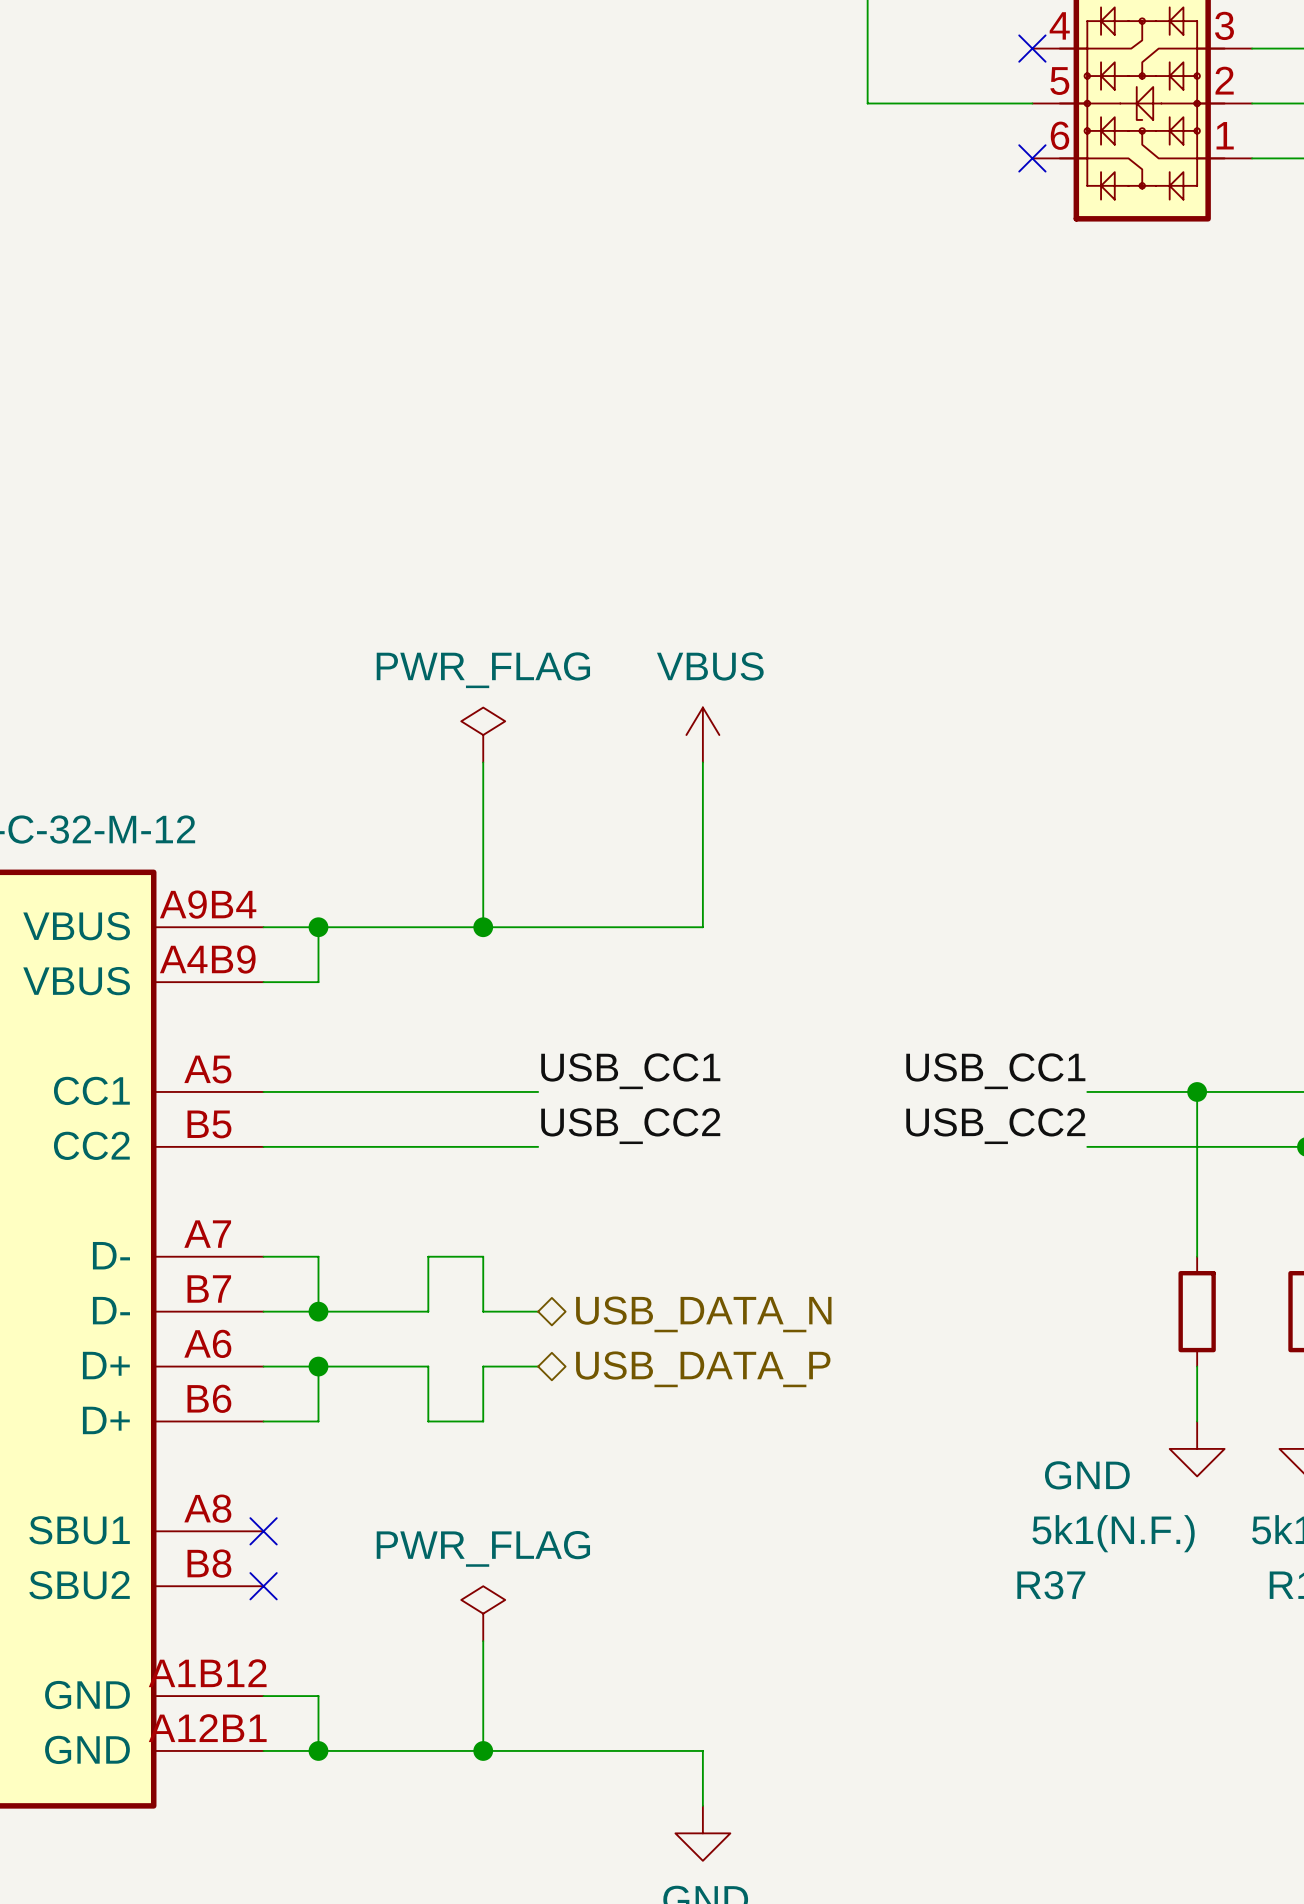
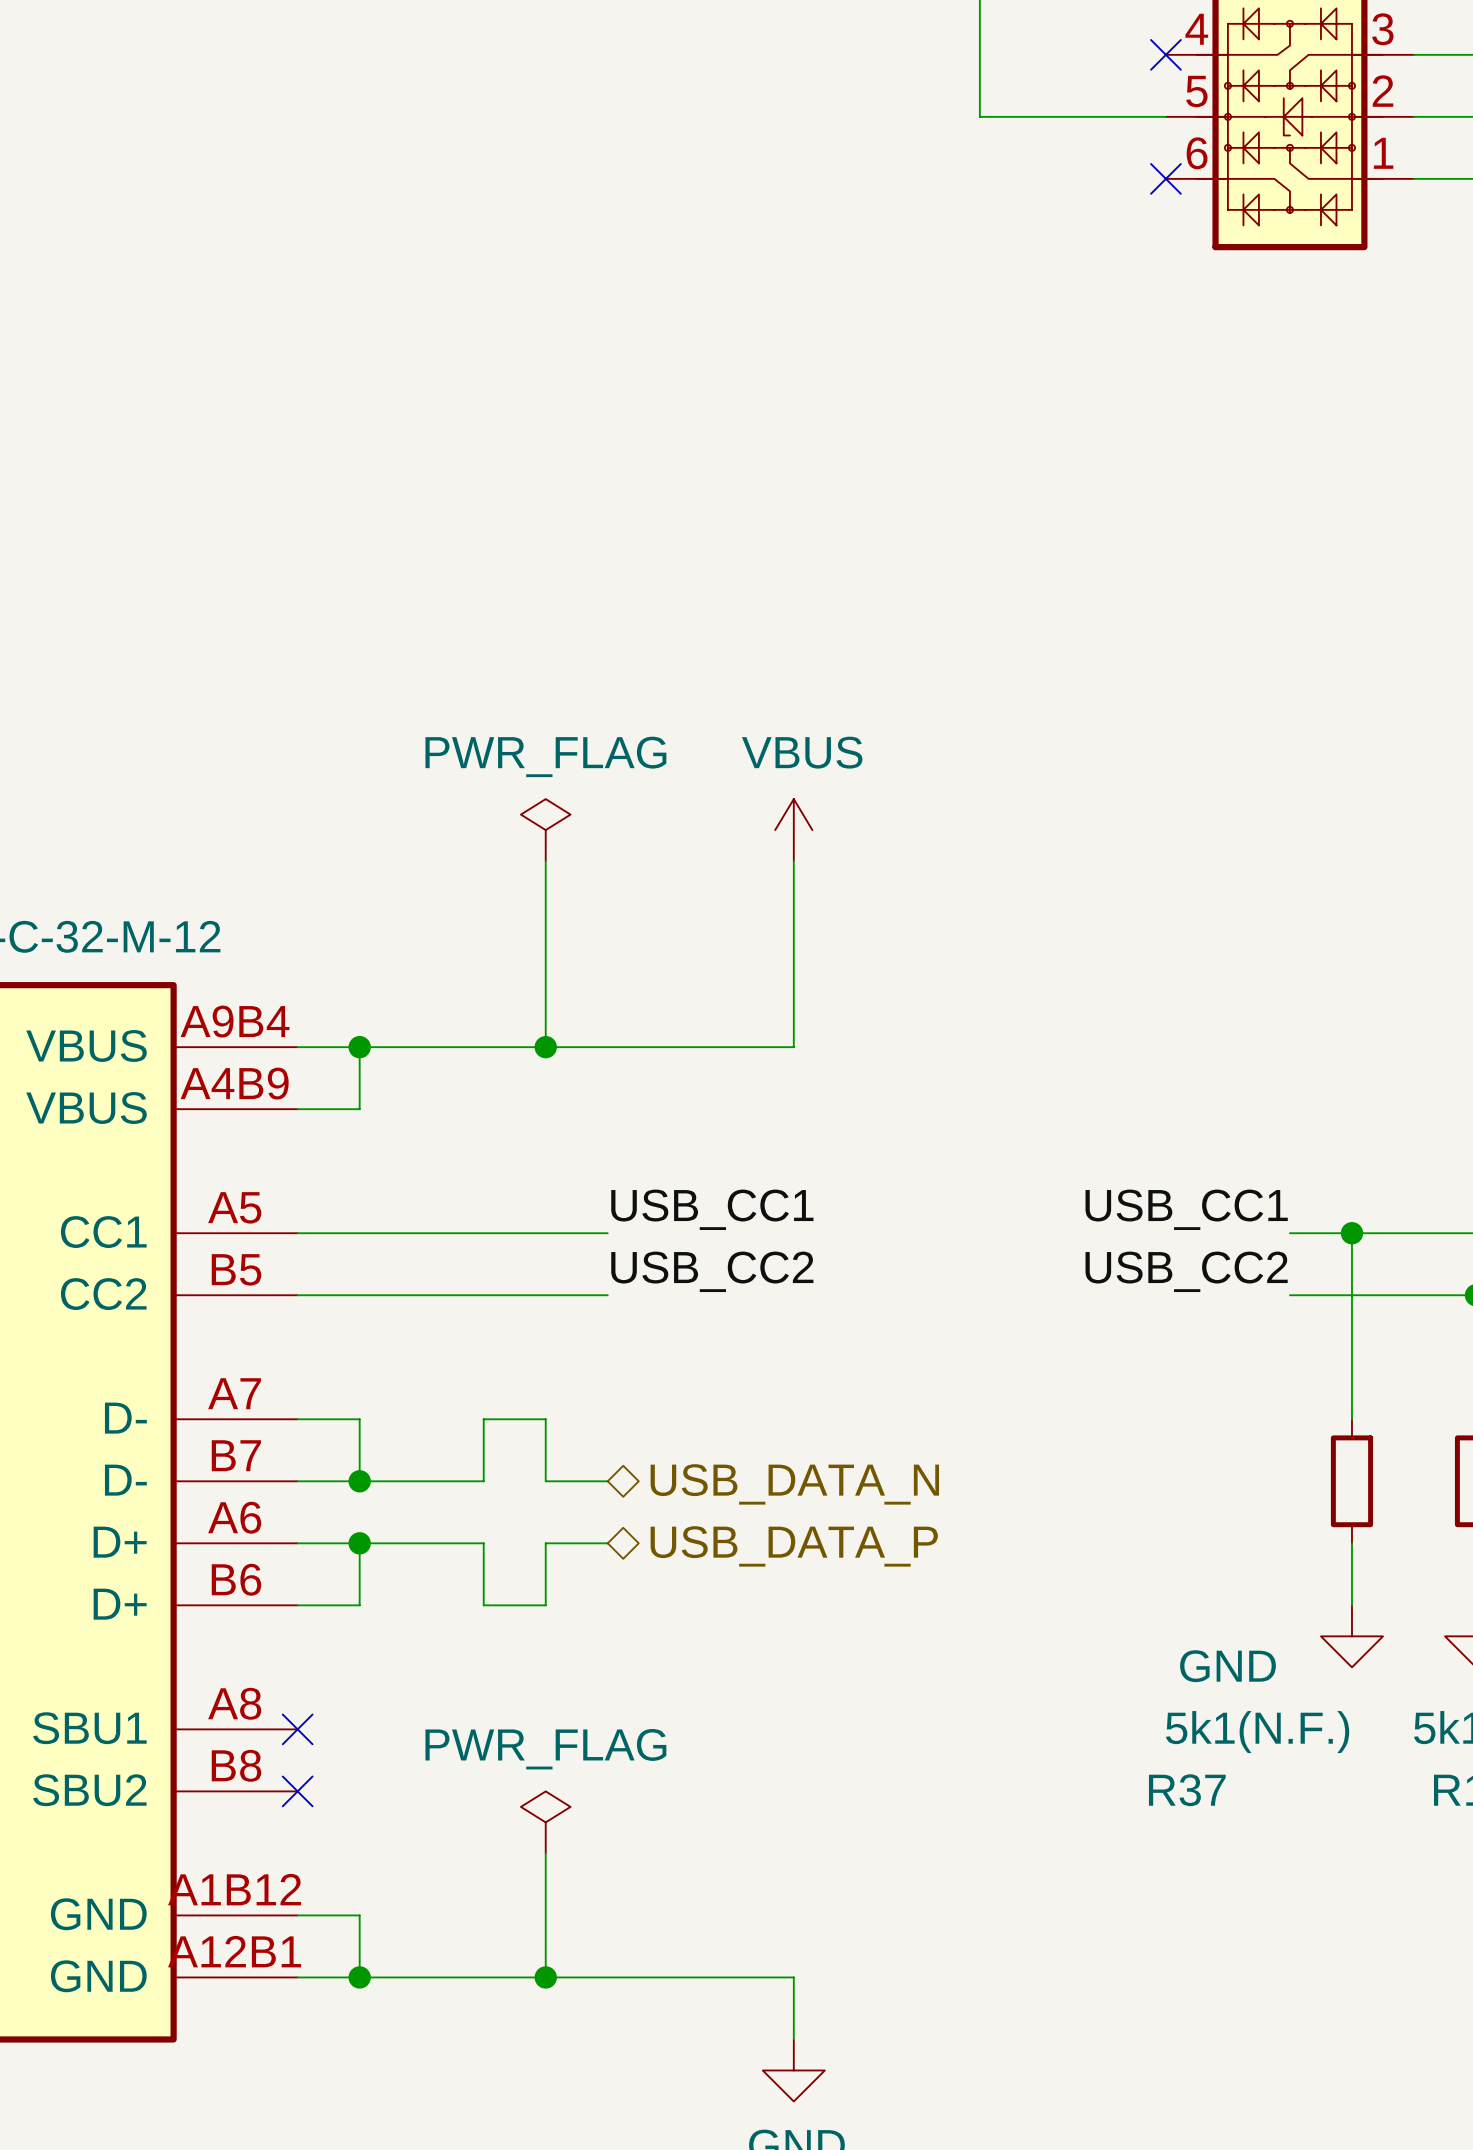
label position: USB_CC1 (995, 1071) -> USB_CC1 (1186, 1209)
wire: (1087, 1091) (1142, 1091) -> none
label position: USB_CC2 (995, 1126) -> USB_CC2 (1186, 1271)
wire: (1087, 1146) (1142, 1146) -> none

